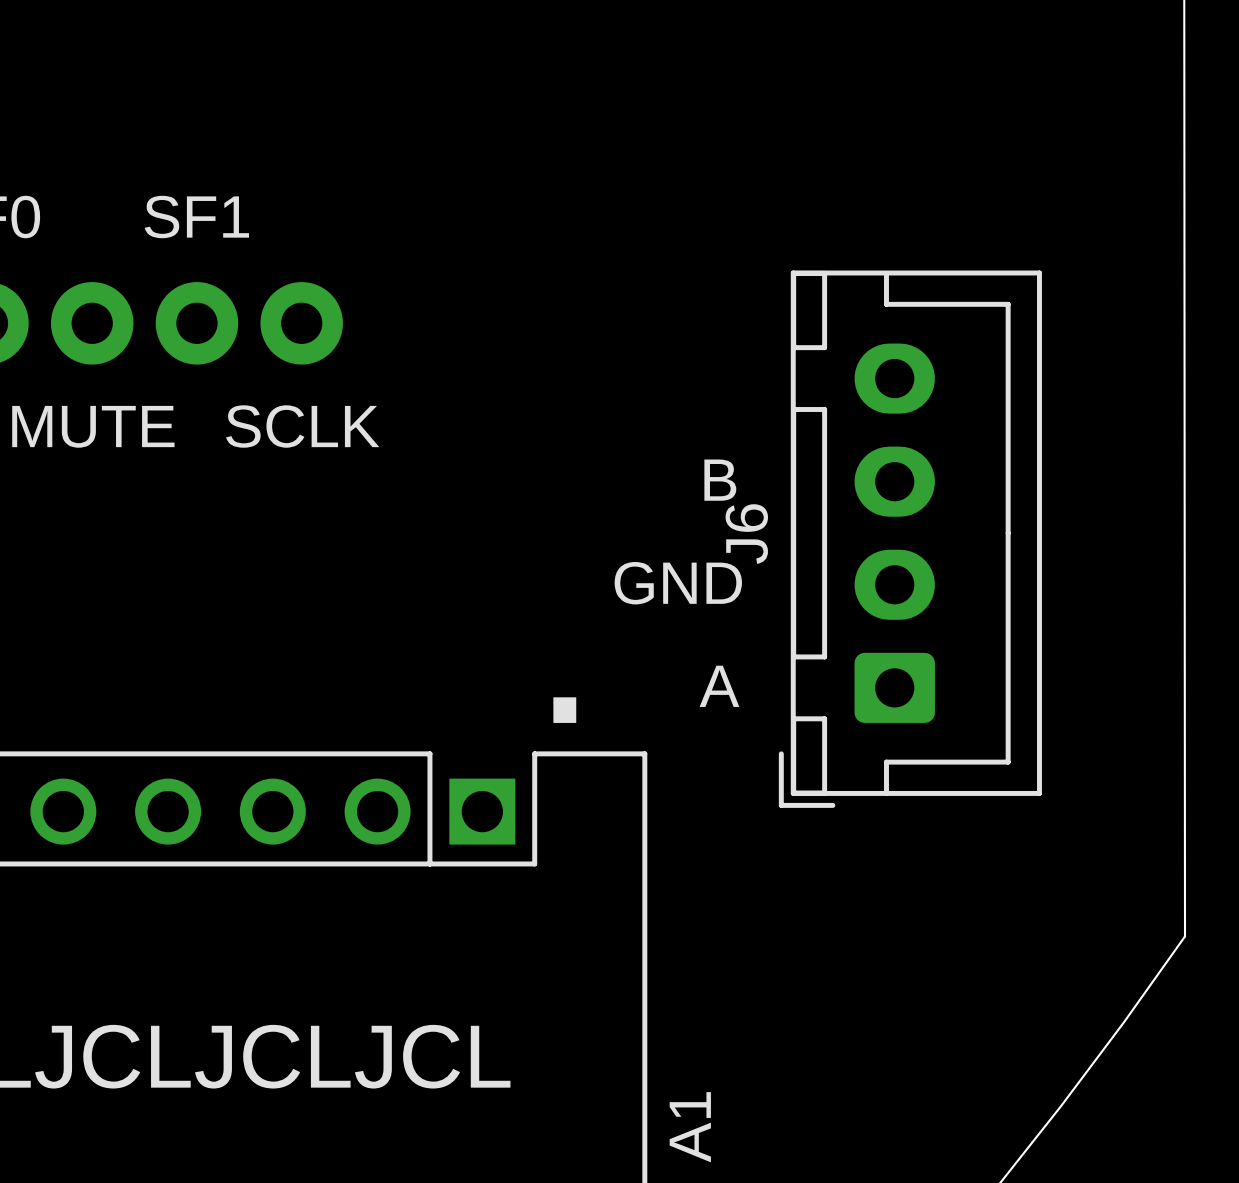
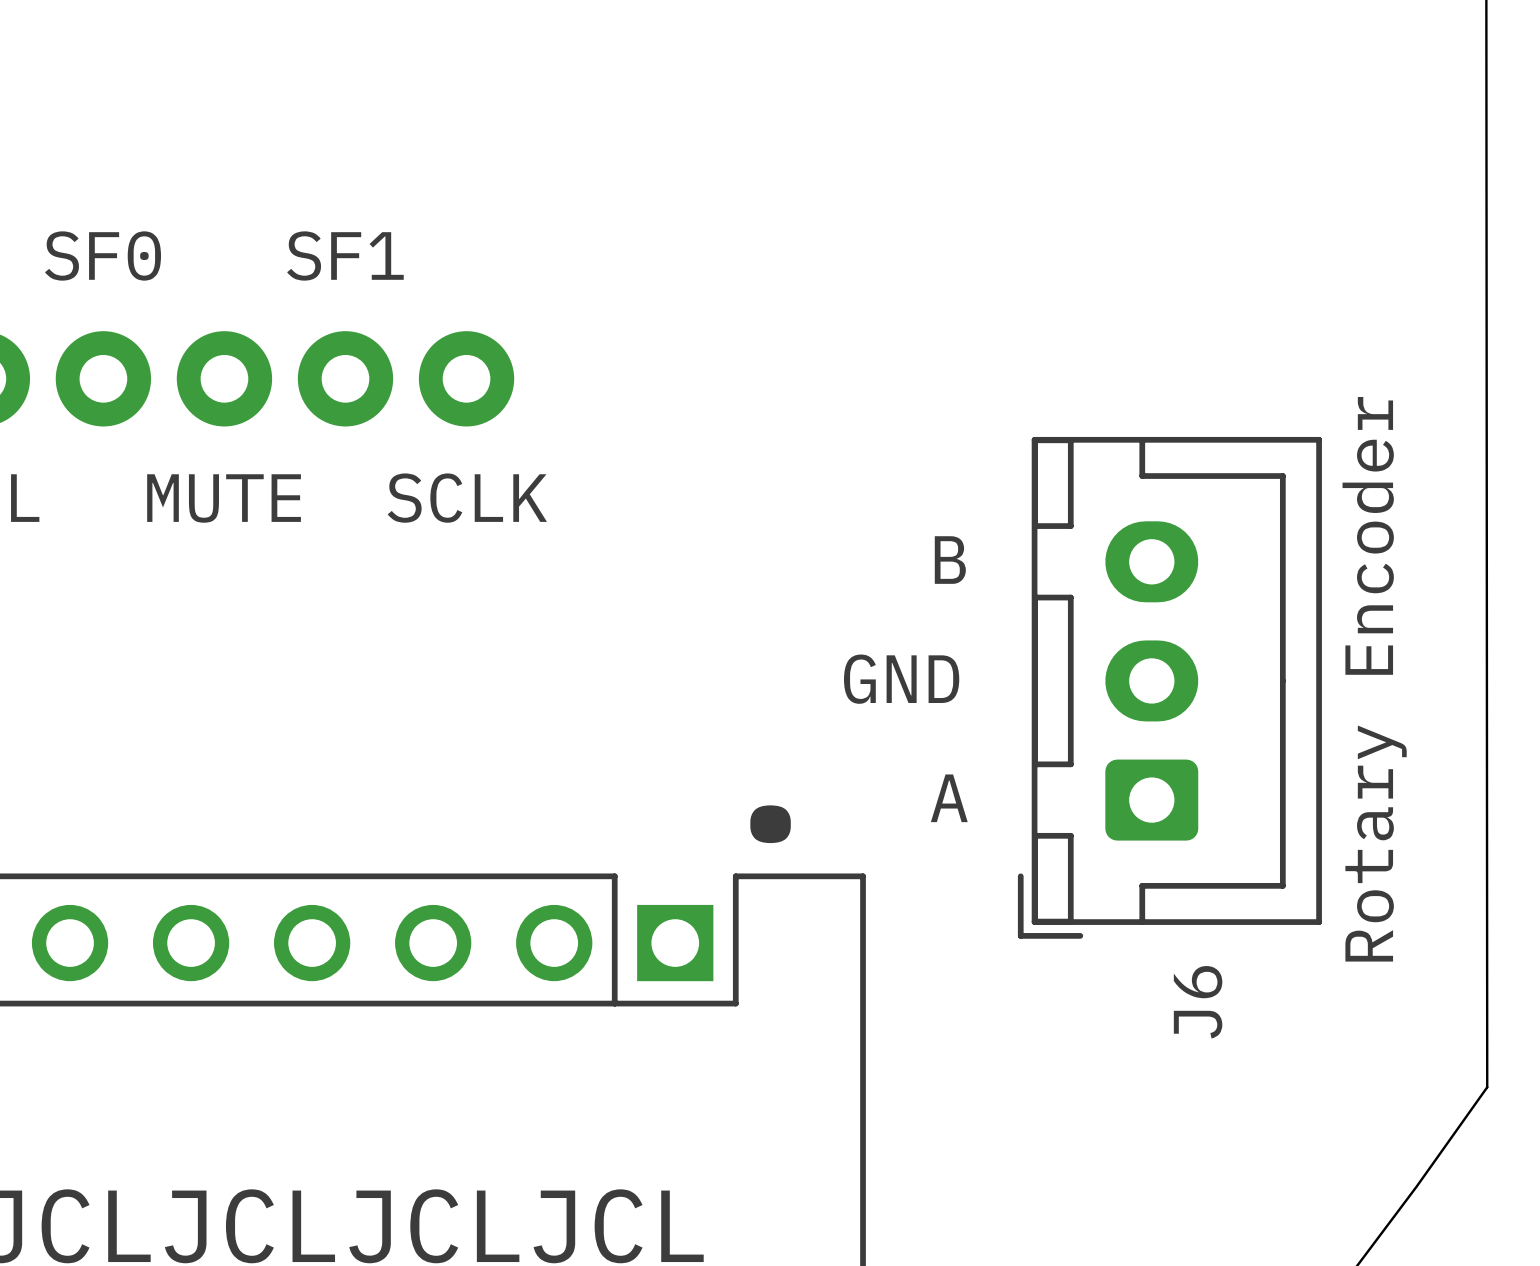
J6 footprint: [778, 270, 1042, 808] -> [1017, 436, 1322, 939]
J6 name position: J6 (746, 534) -> J6 (1198, 1002)
J6 value: none -> Rotary Encoder (1374, 679)

